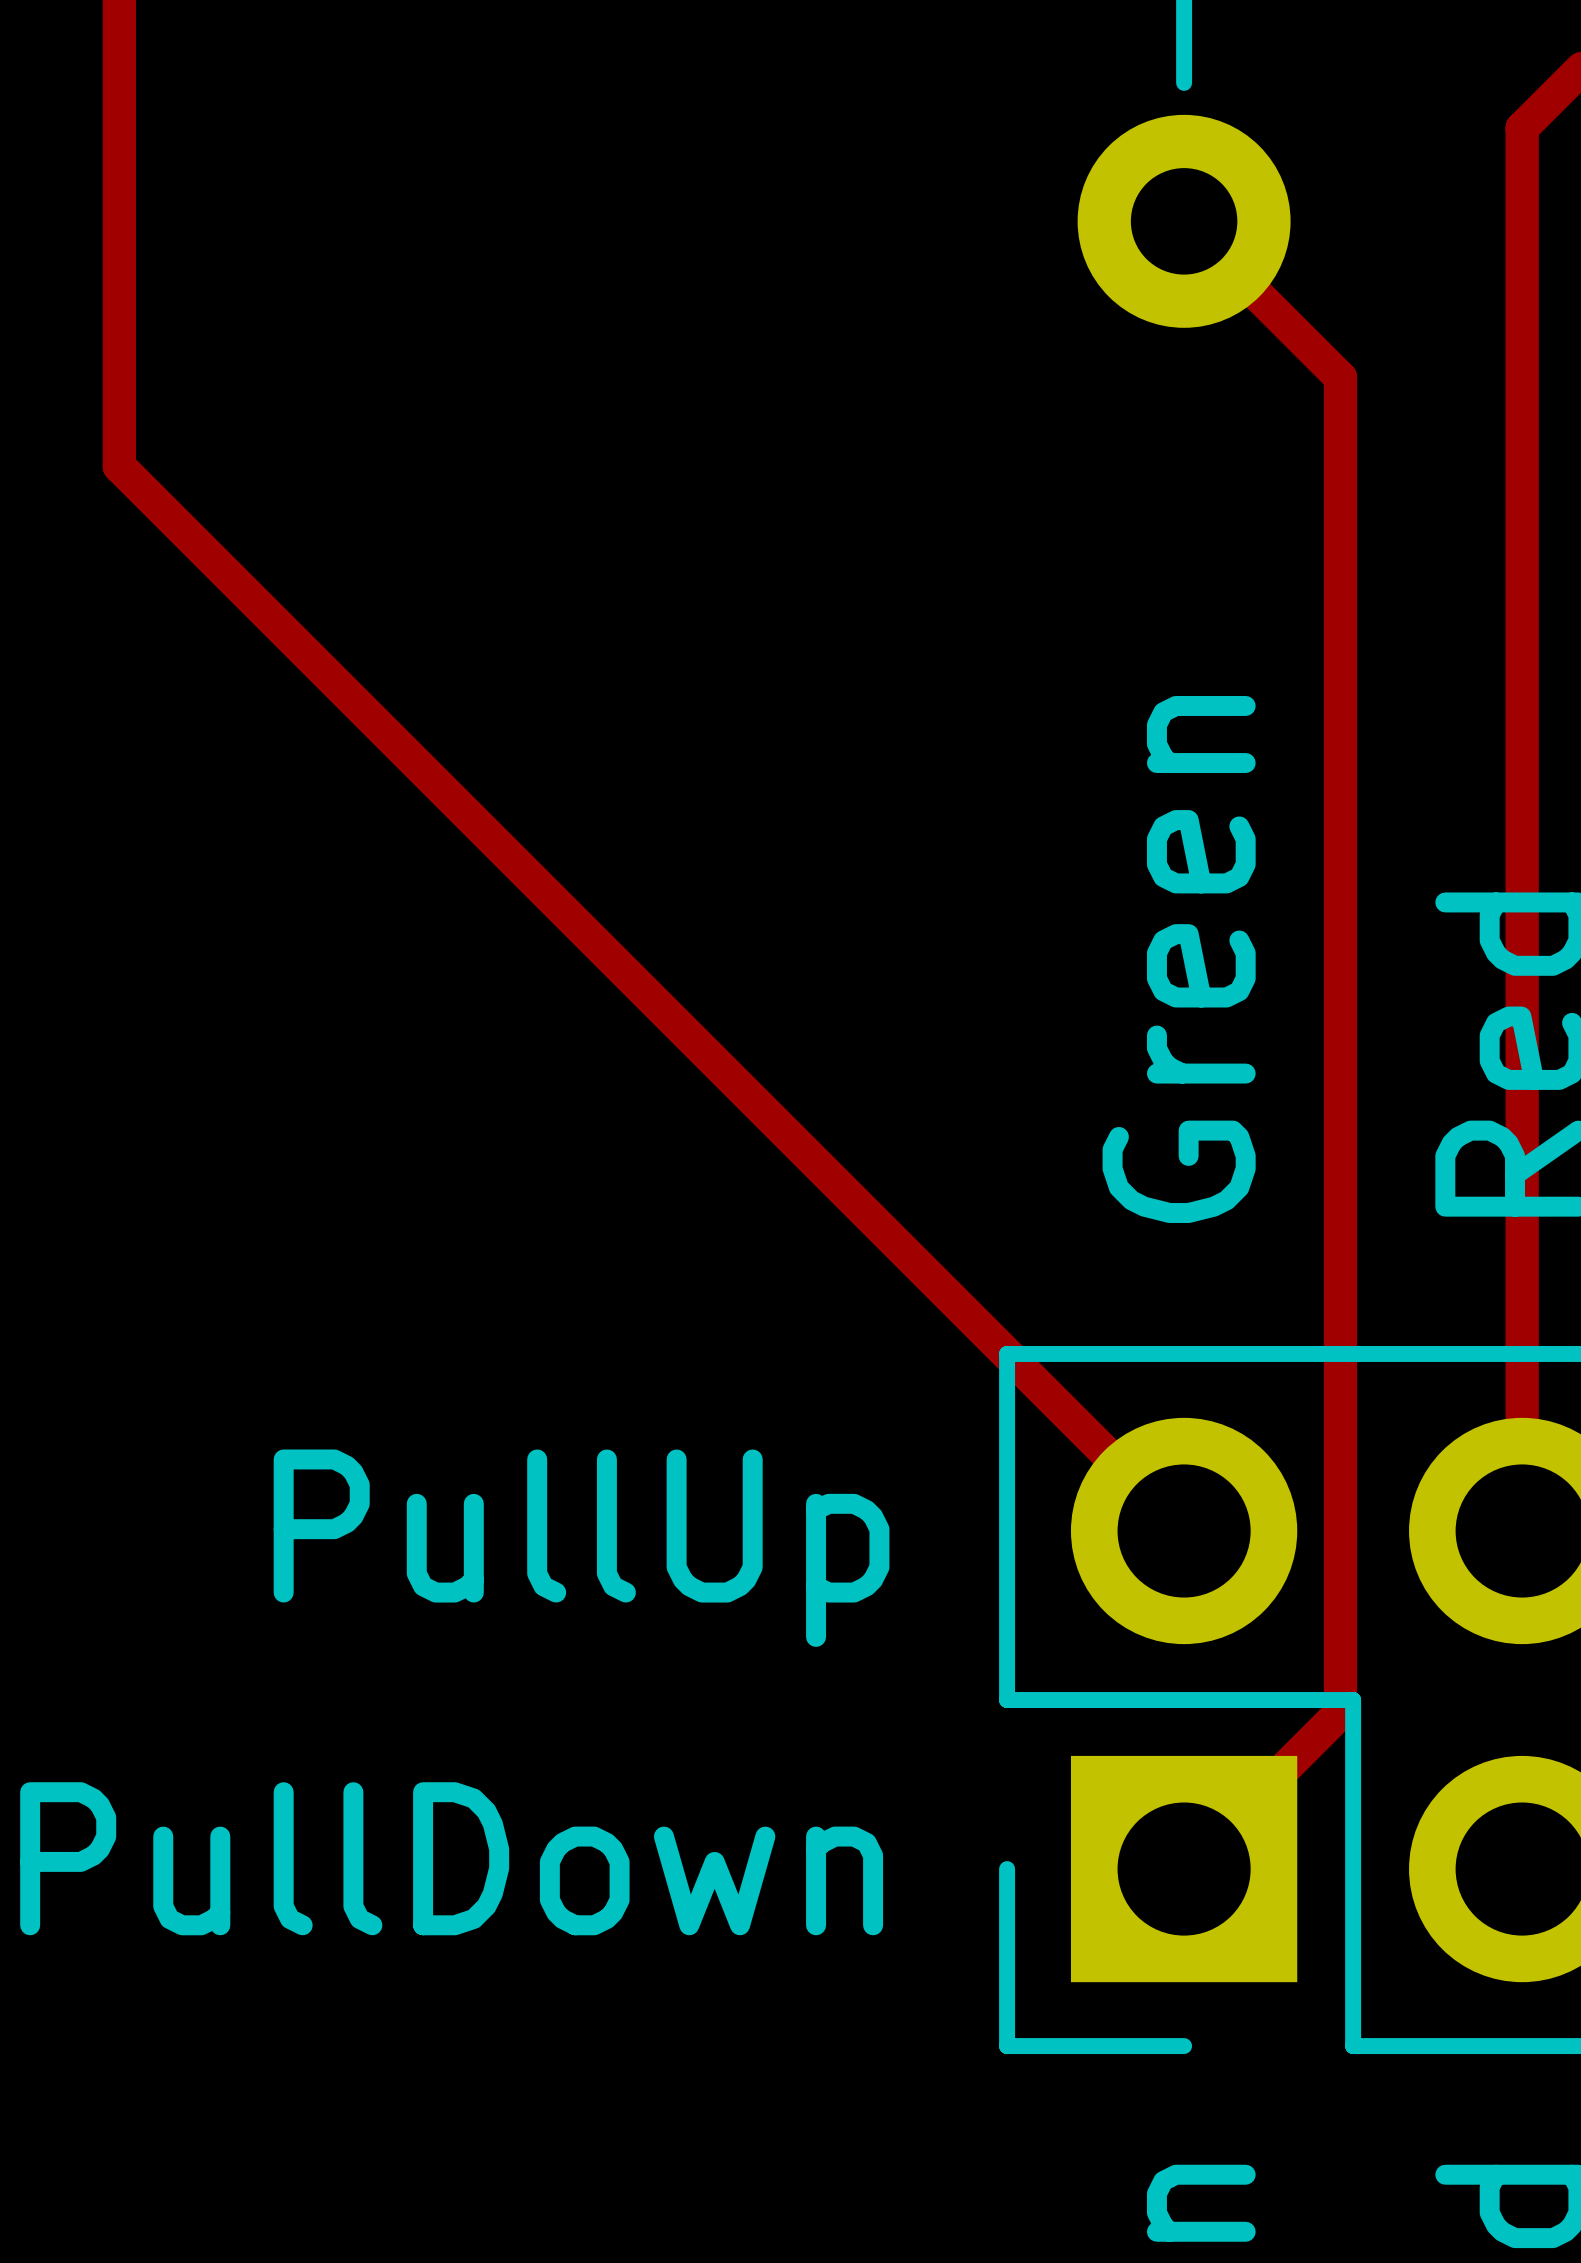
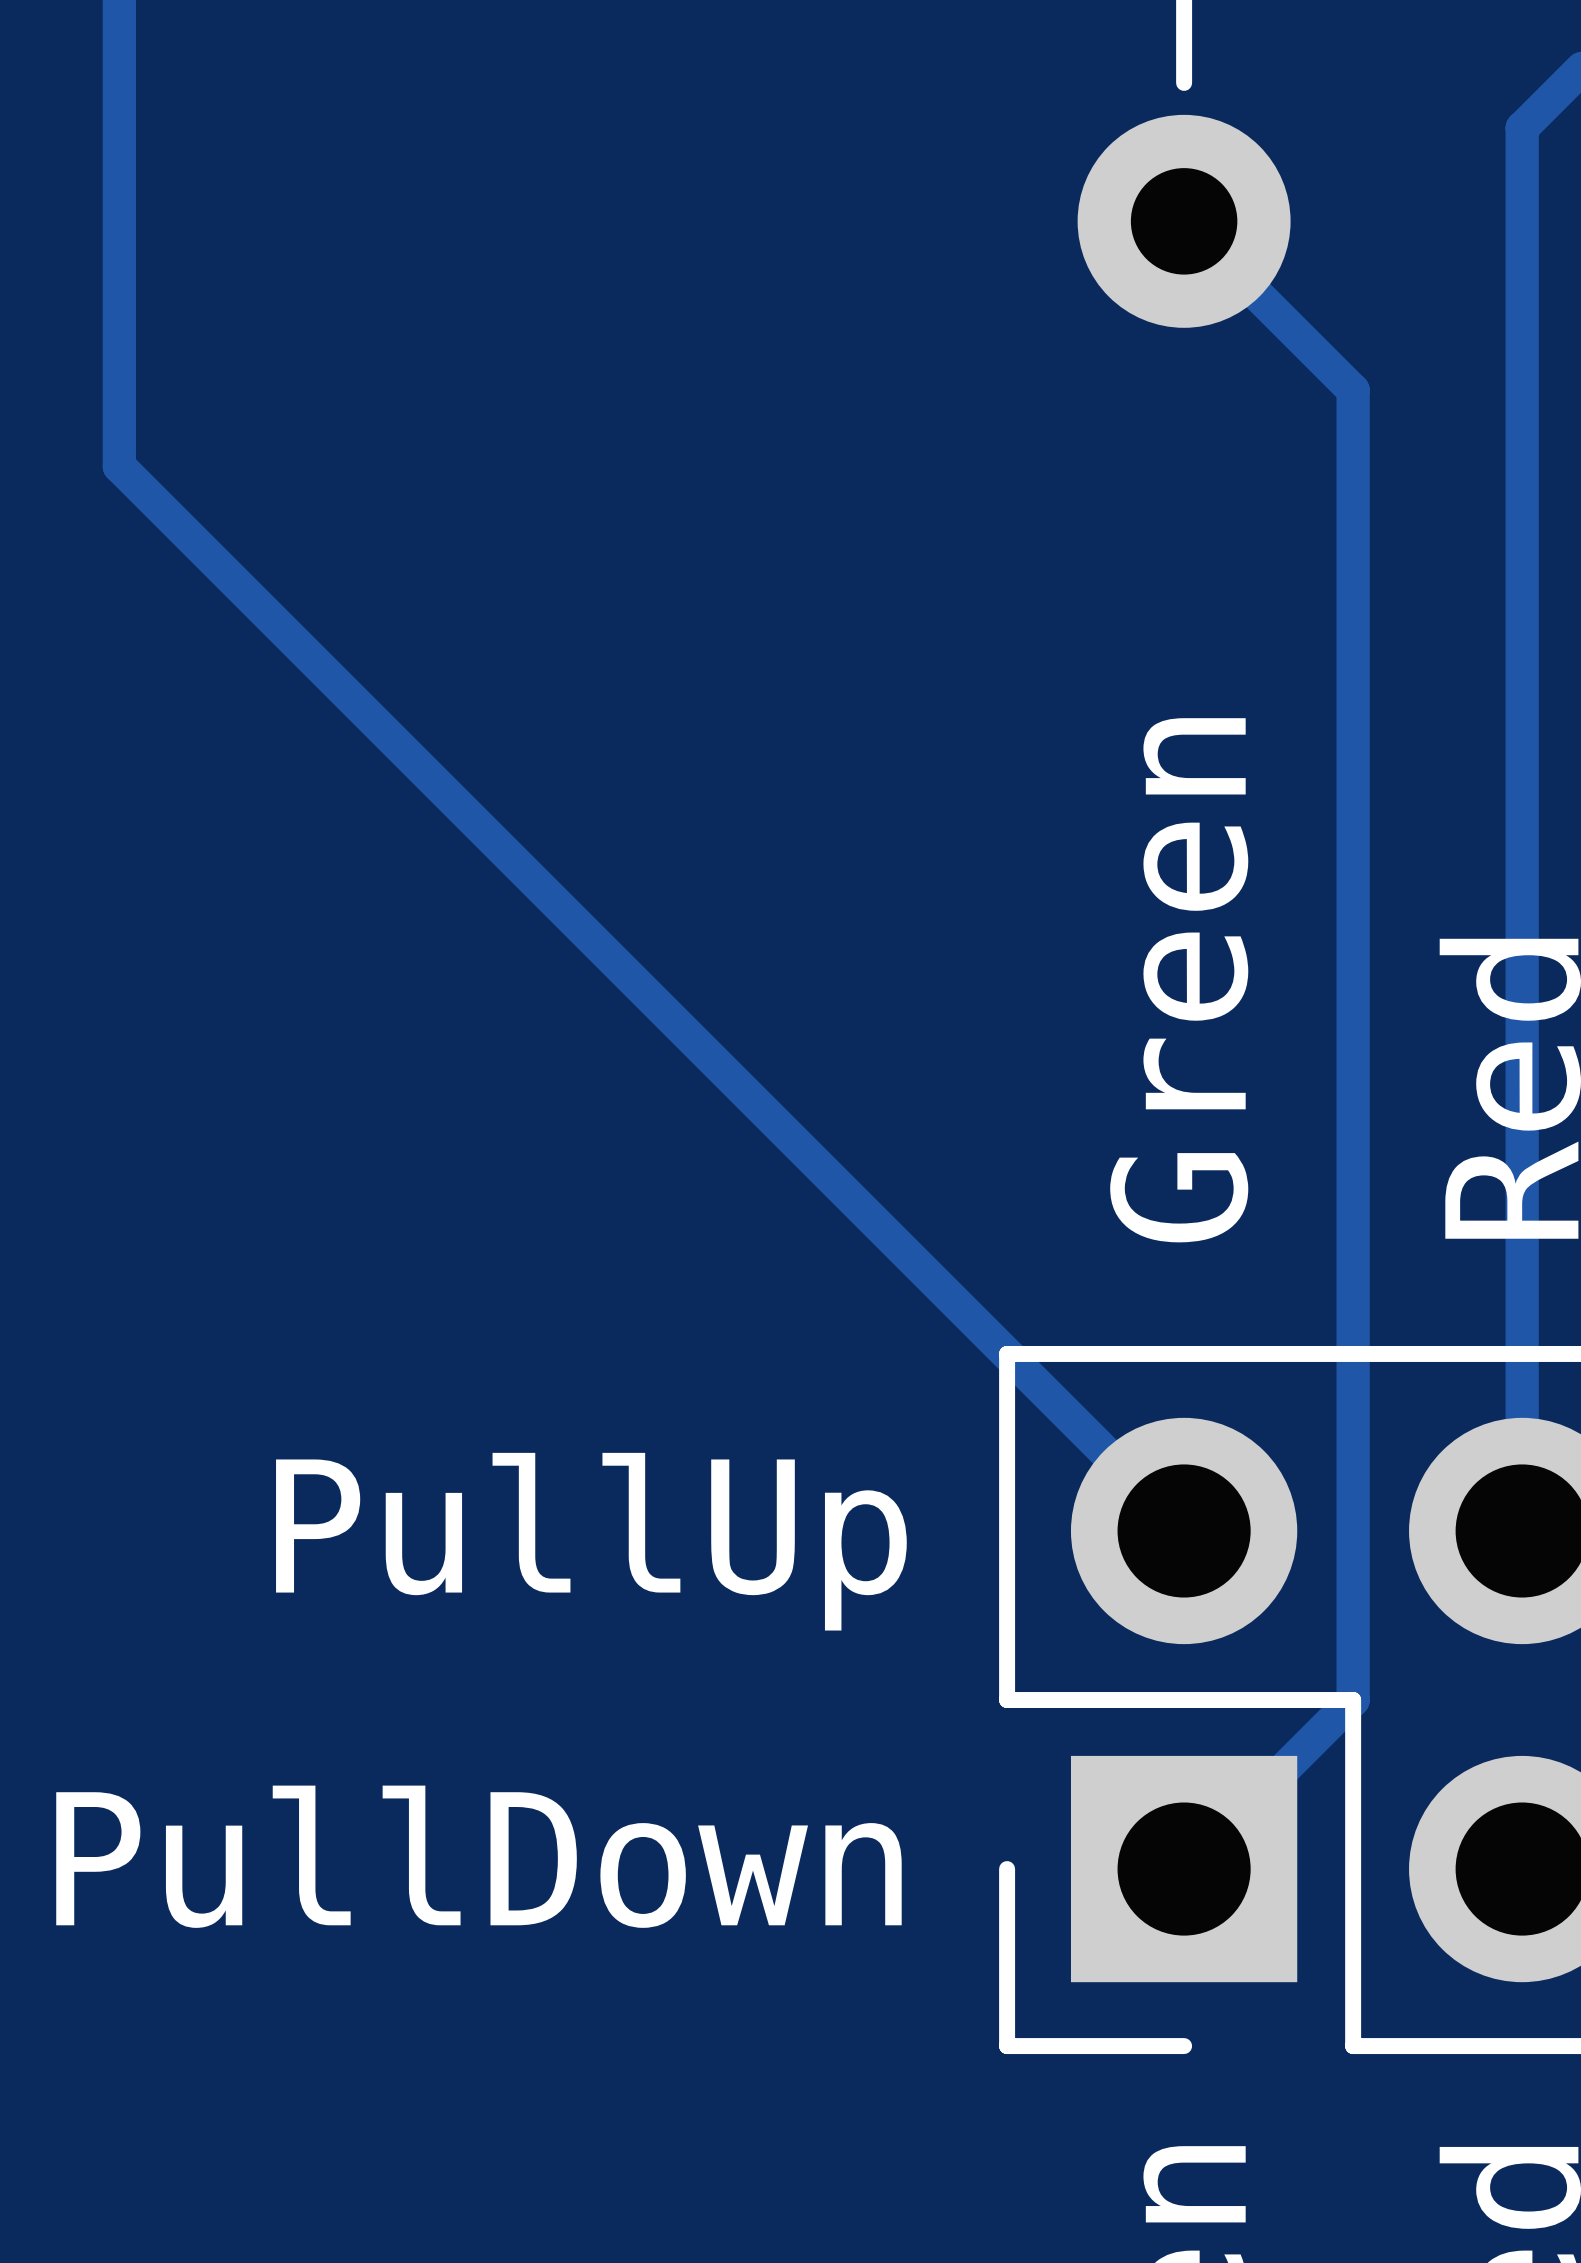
track: (1340, 377) (1340, 1712) -> (1340, 377) (1353, 390) (1353, 1700) (1340, 1712)

